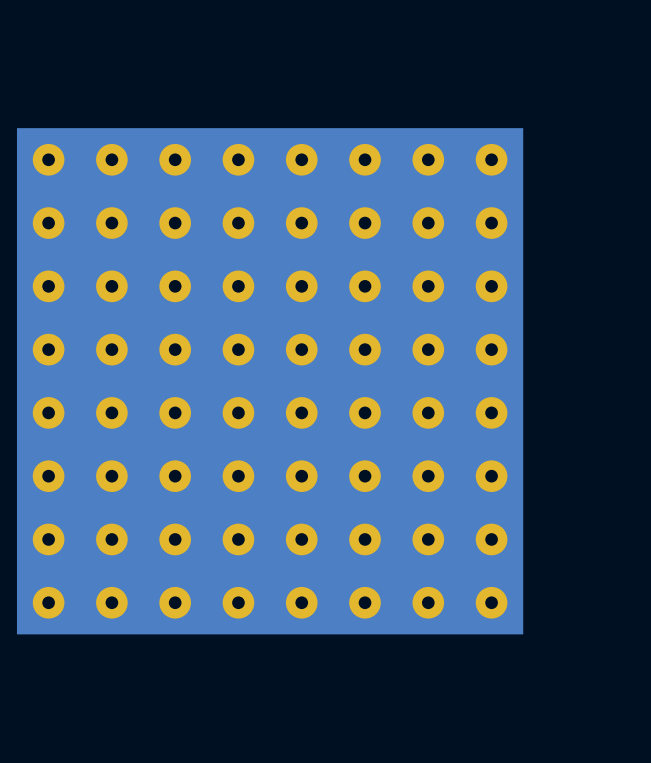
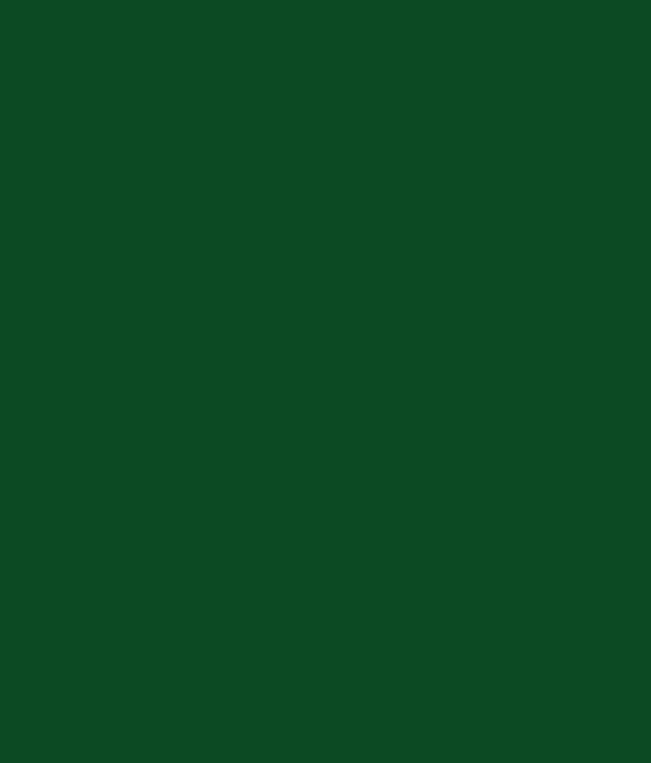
part: (270, 381) -> none

